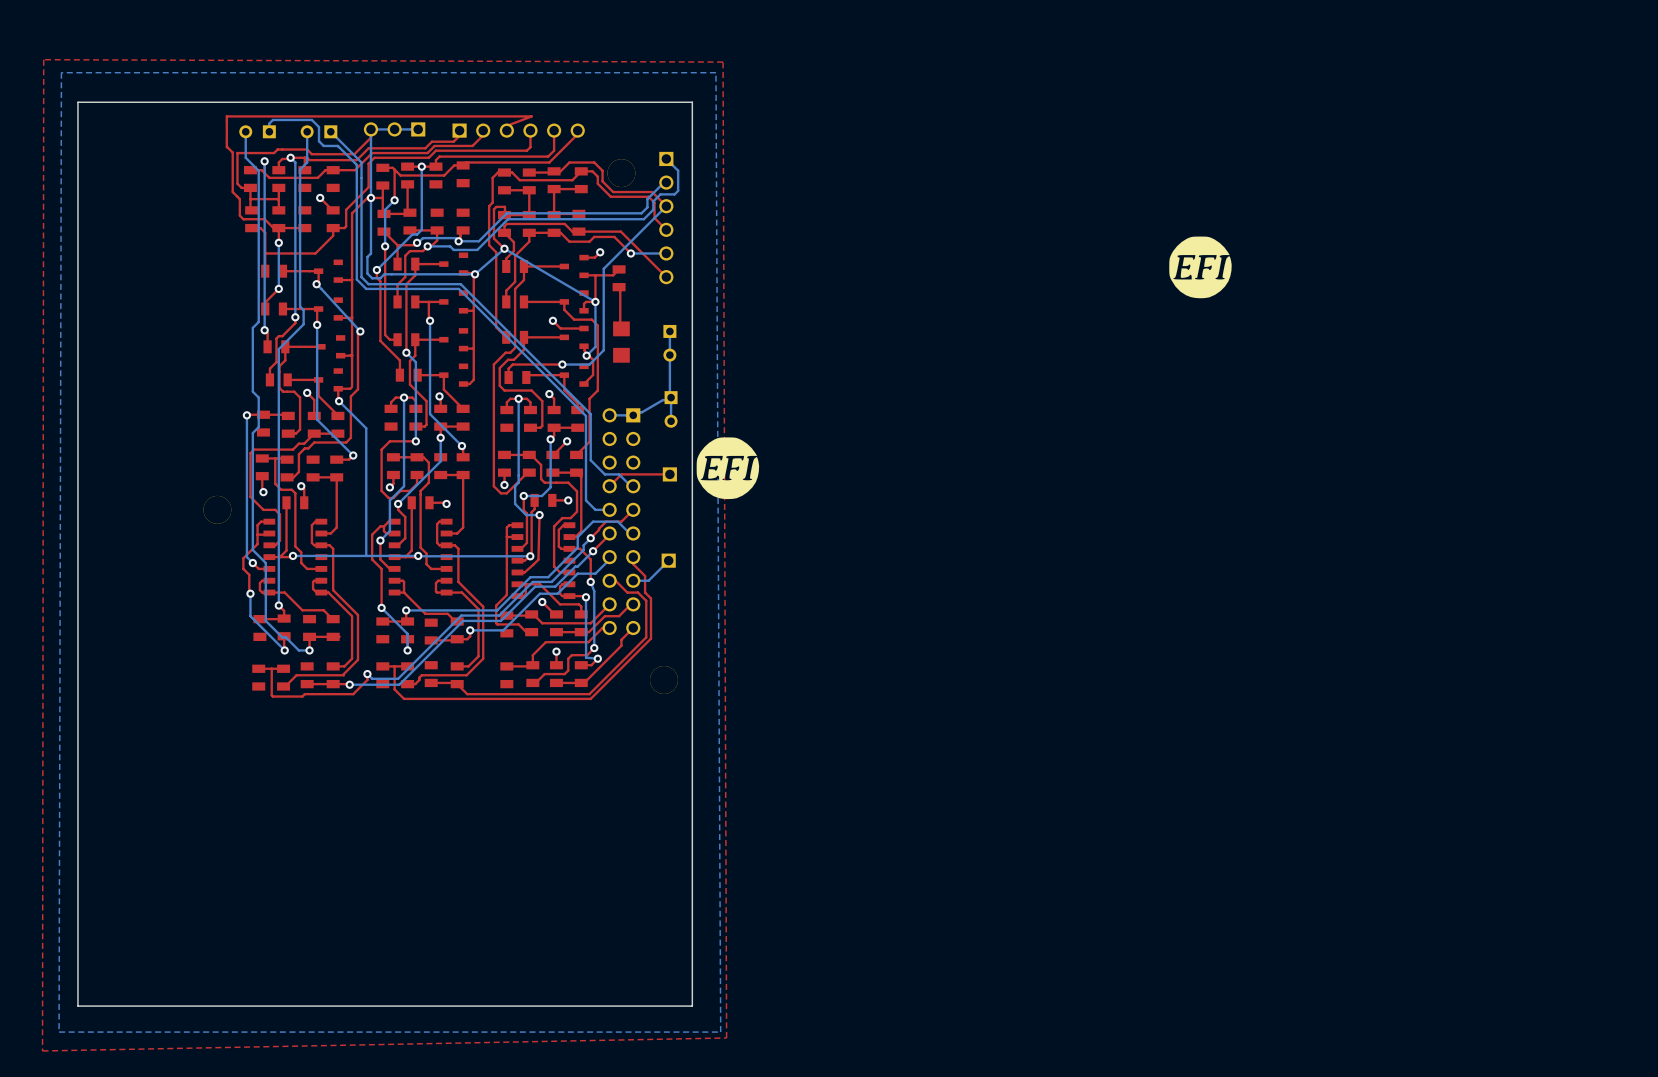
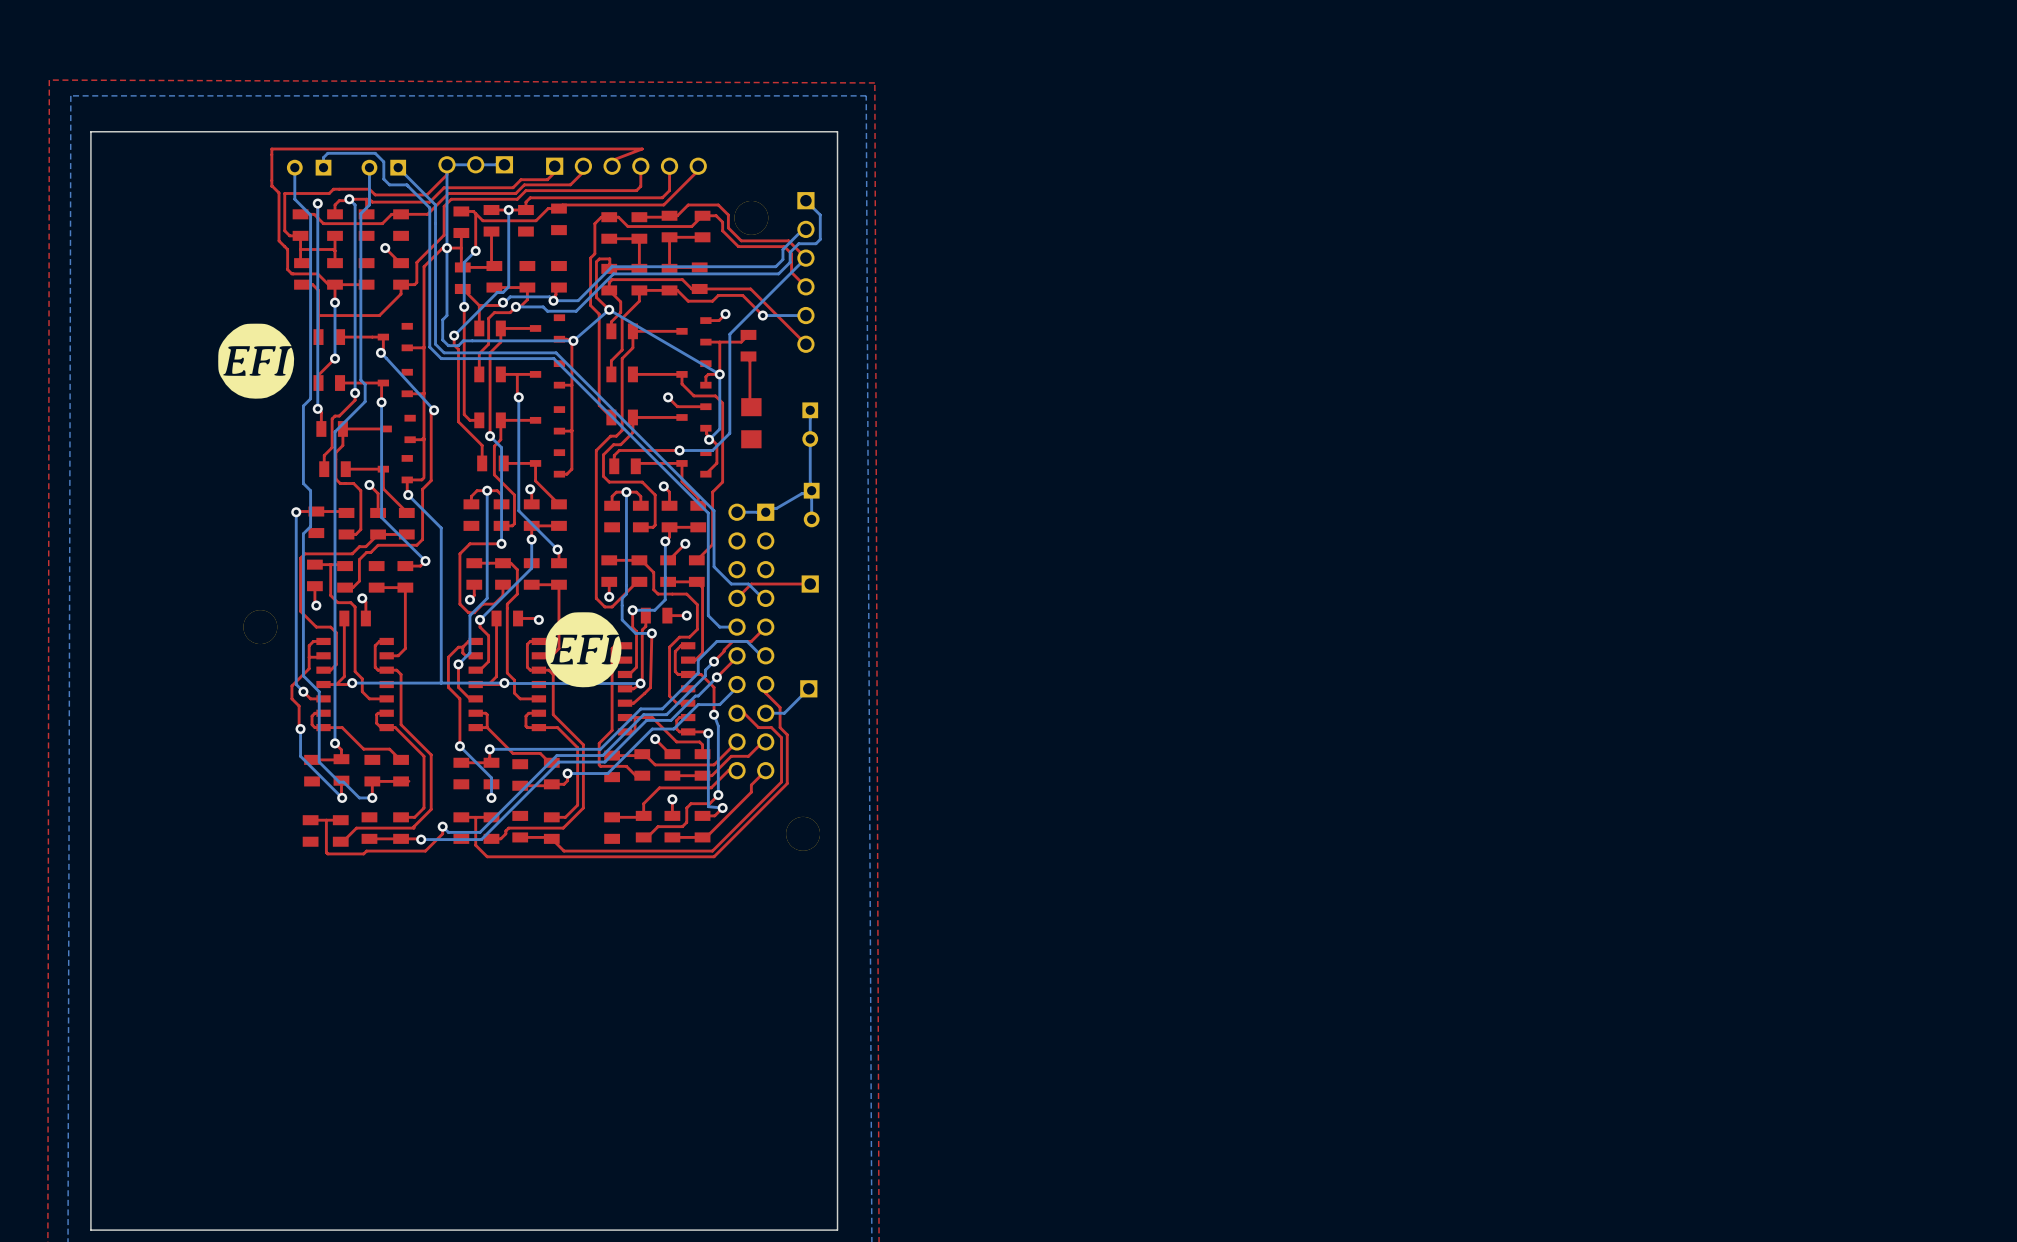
drawing: [1169, 236, 1232, 299] -> none
drawing: none -> [218, 323, 295, 399]
drawing: [696, 437, 760, 500] -> none
drawing: none -> [545, 612, 622, 688]

